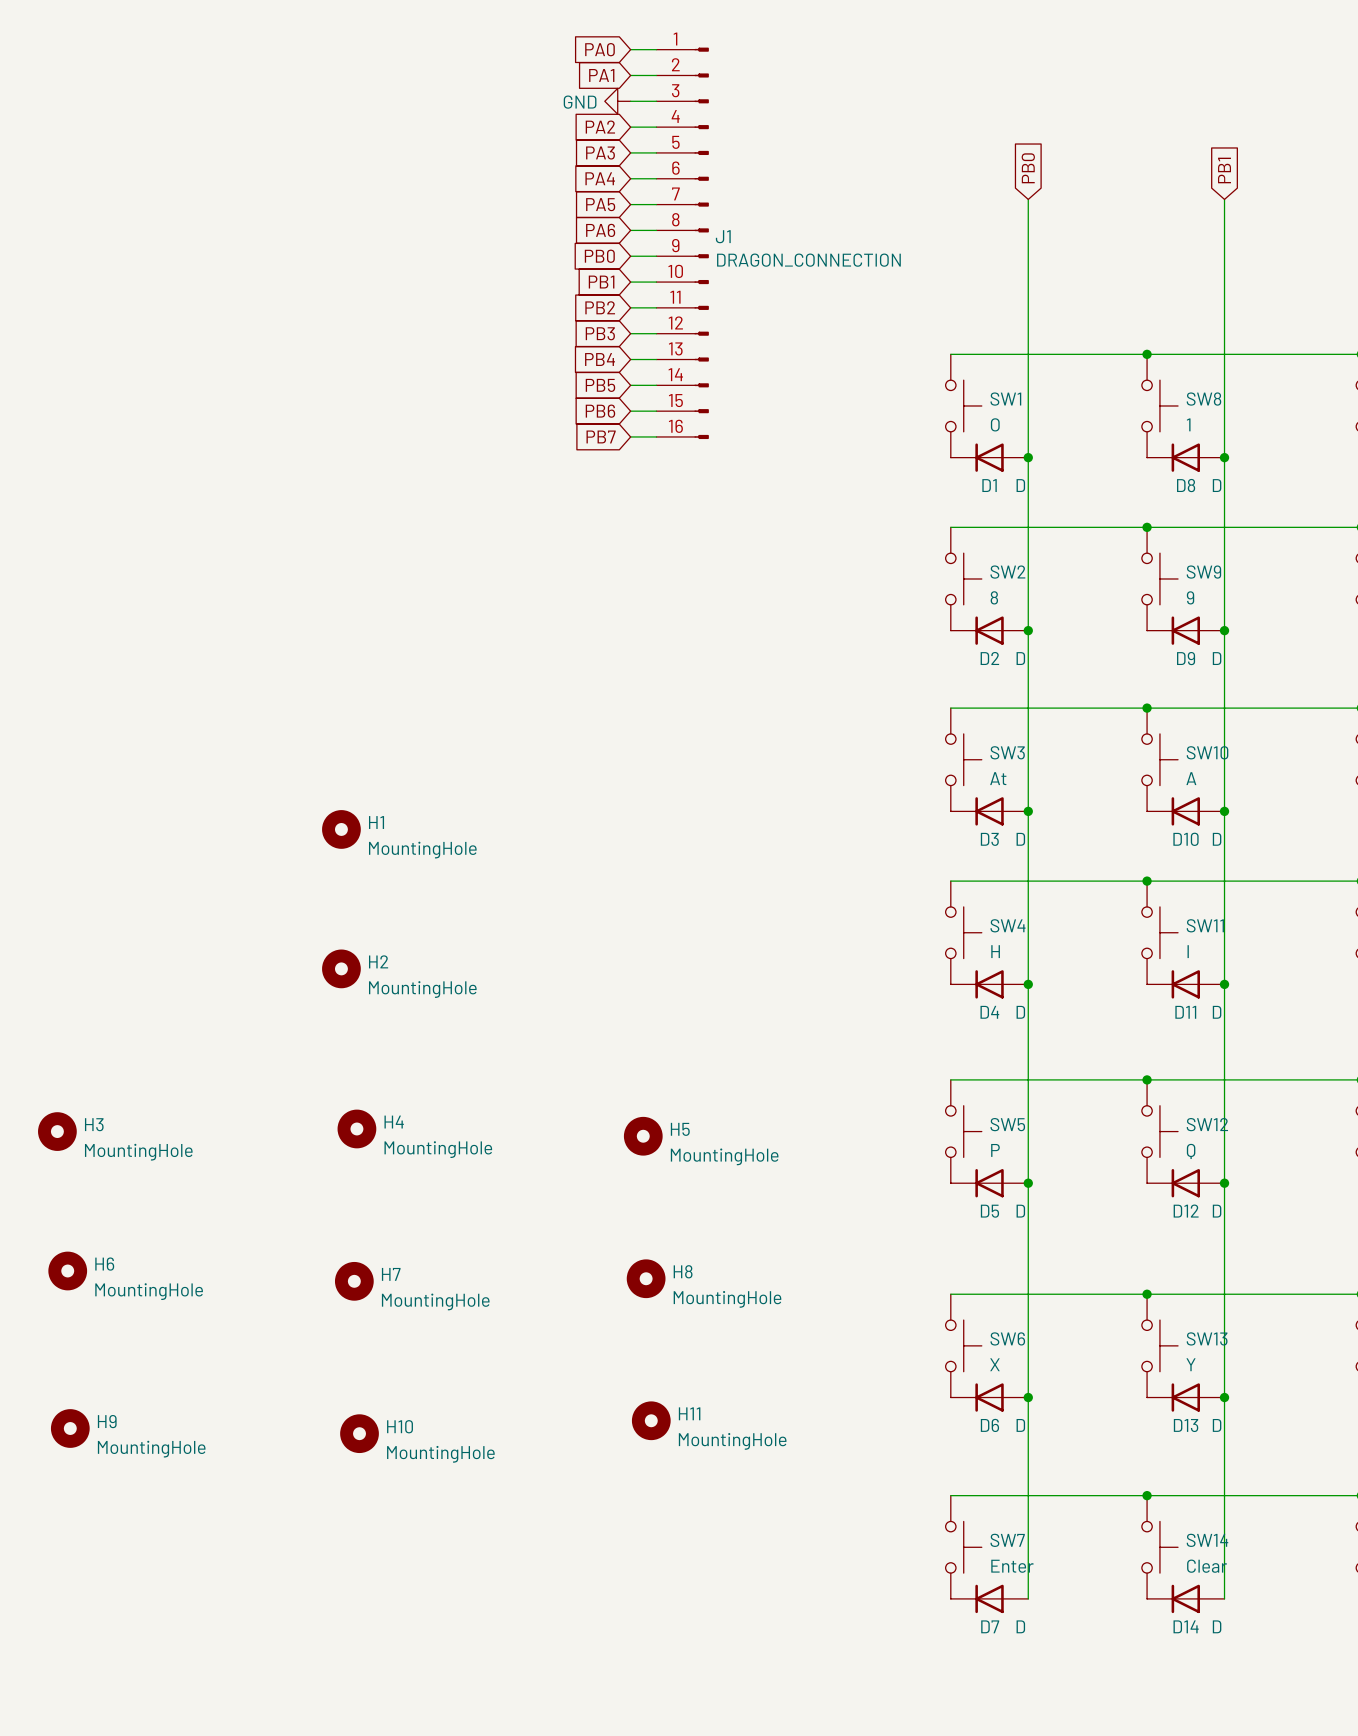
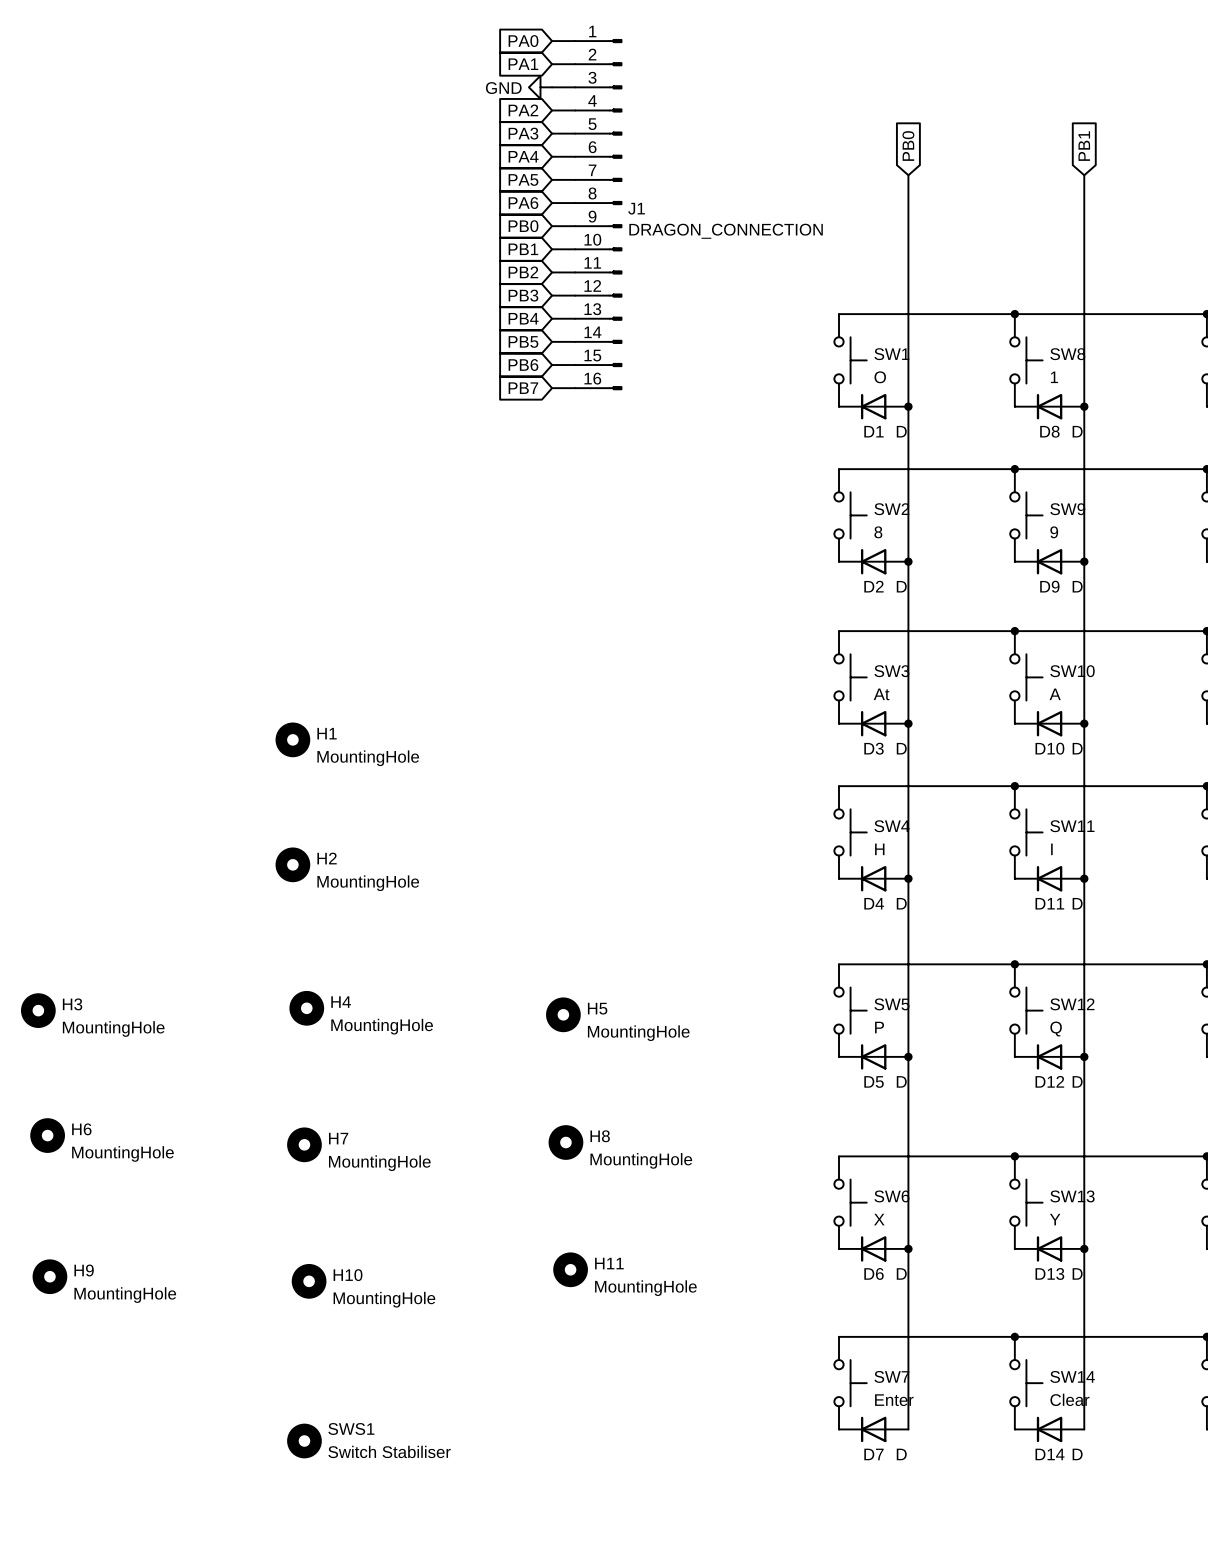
SWS1: none -> Switch Stabiliser (304, 1441)

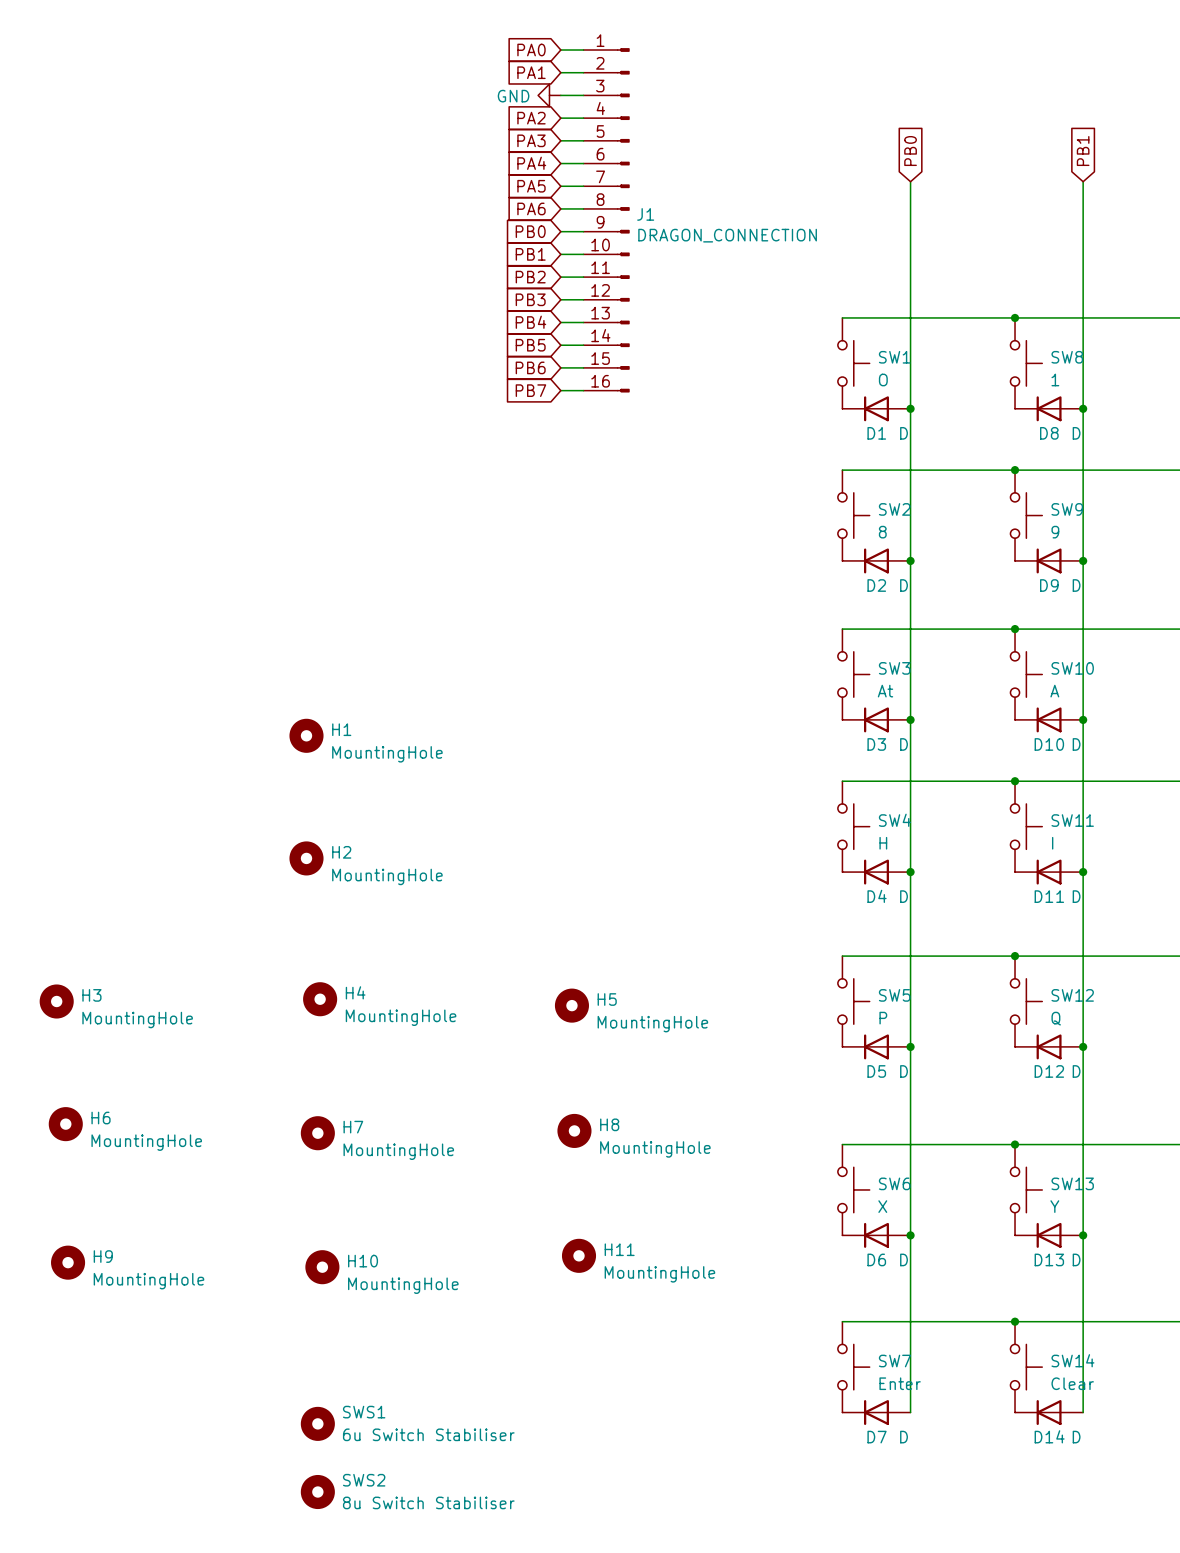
SWS1 value: Switch Stabiliser (389, 1451) -> 6u Switch Stabiliser (428, 1434)
SWS2: none -> 8u Switch Stabiliser (317, 1492)

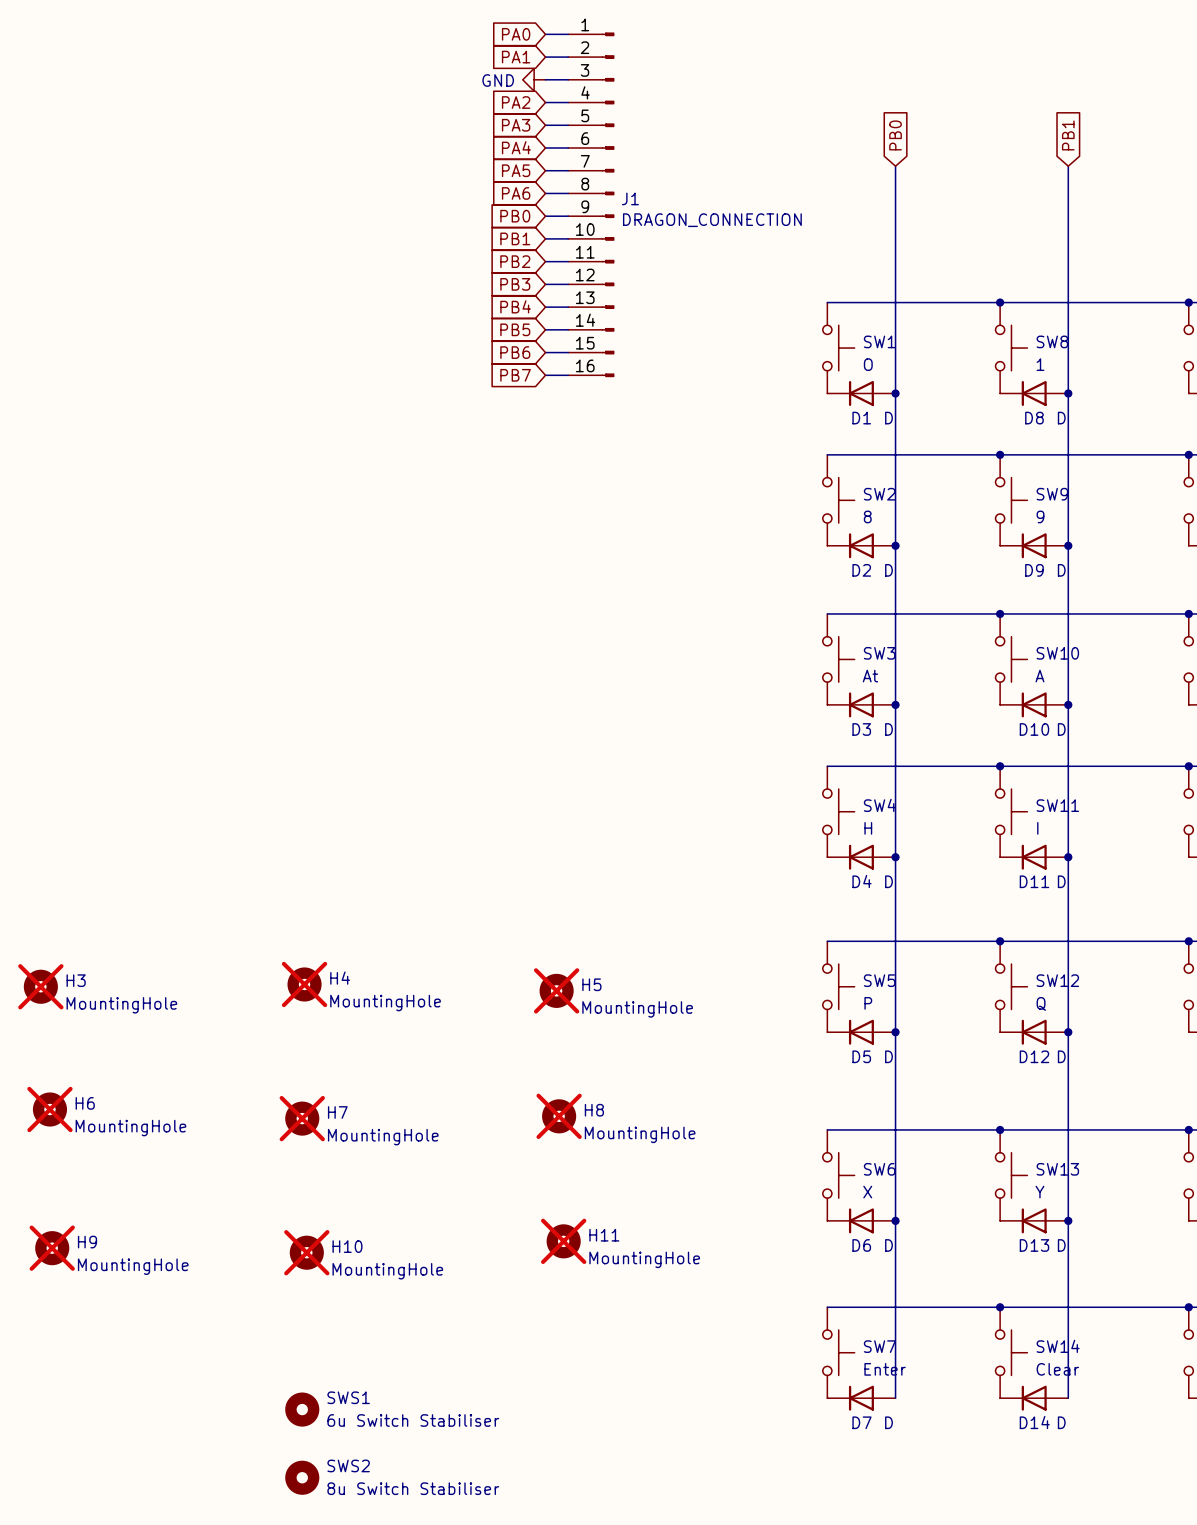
H1: MountingHole (306, 735) -> none
H2: MountingHole (306, 858) -> none
H4 do-not-place cross: none -> (304, 984)
H3 do-not-place cross: none -> (40, 986)
H5 do-not-place cross: none -> (556, 990)
H6 do-not-place cross: none -> (49, 1109)
H8 do-not-place cross: none -> (559, 1116)
H7 do-not-place cross: none -> (302, 1118)
H11 do-not-place cross: none -> (563, 1241)
H9 do-not-place cross: none -> (52, 1248)
H10 do-not-place cross: none -> (306, 1252)

